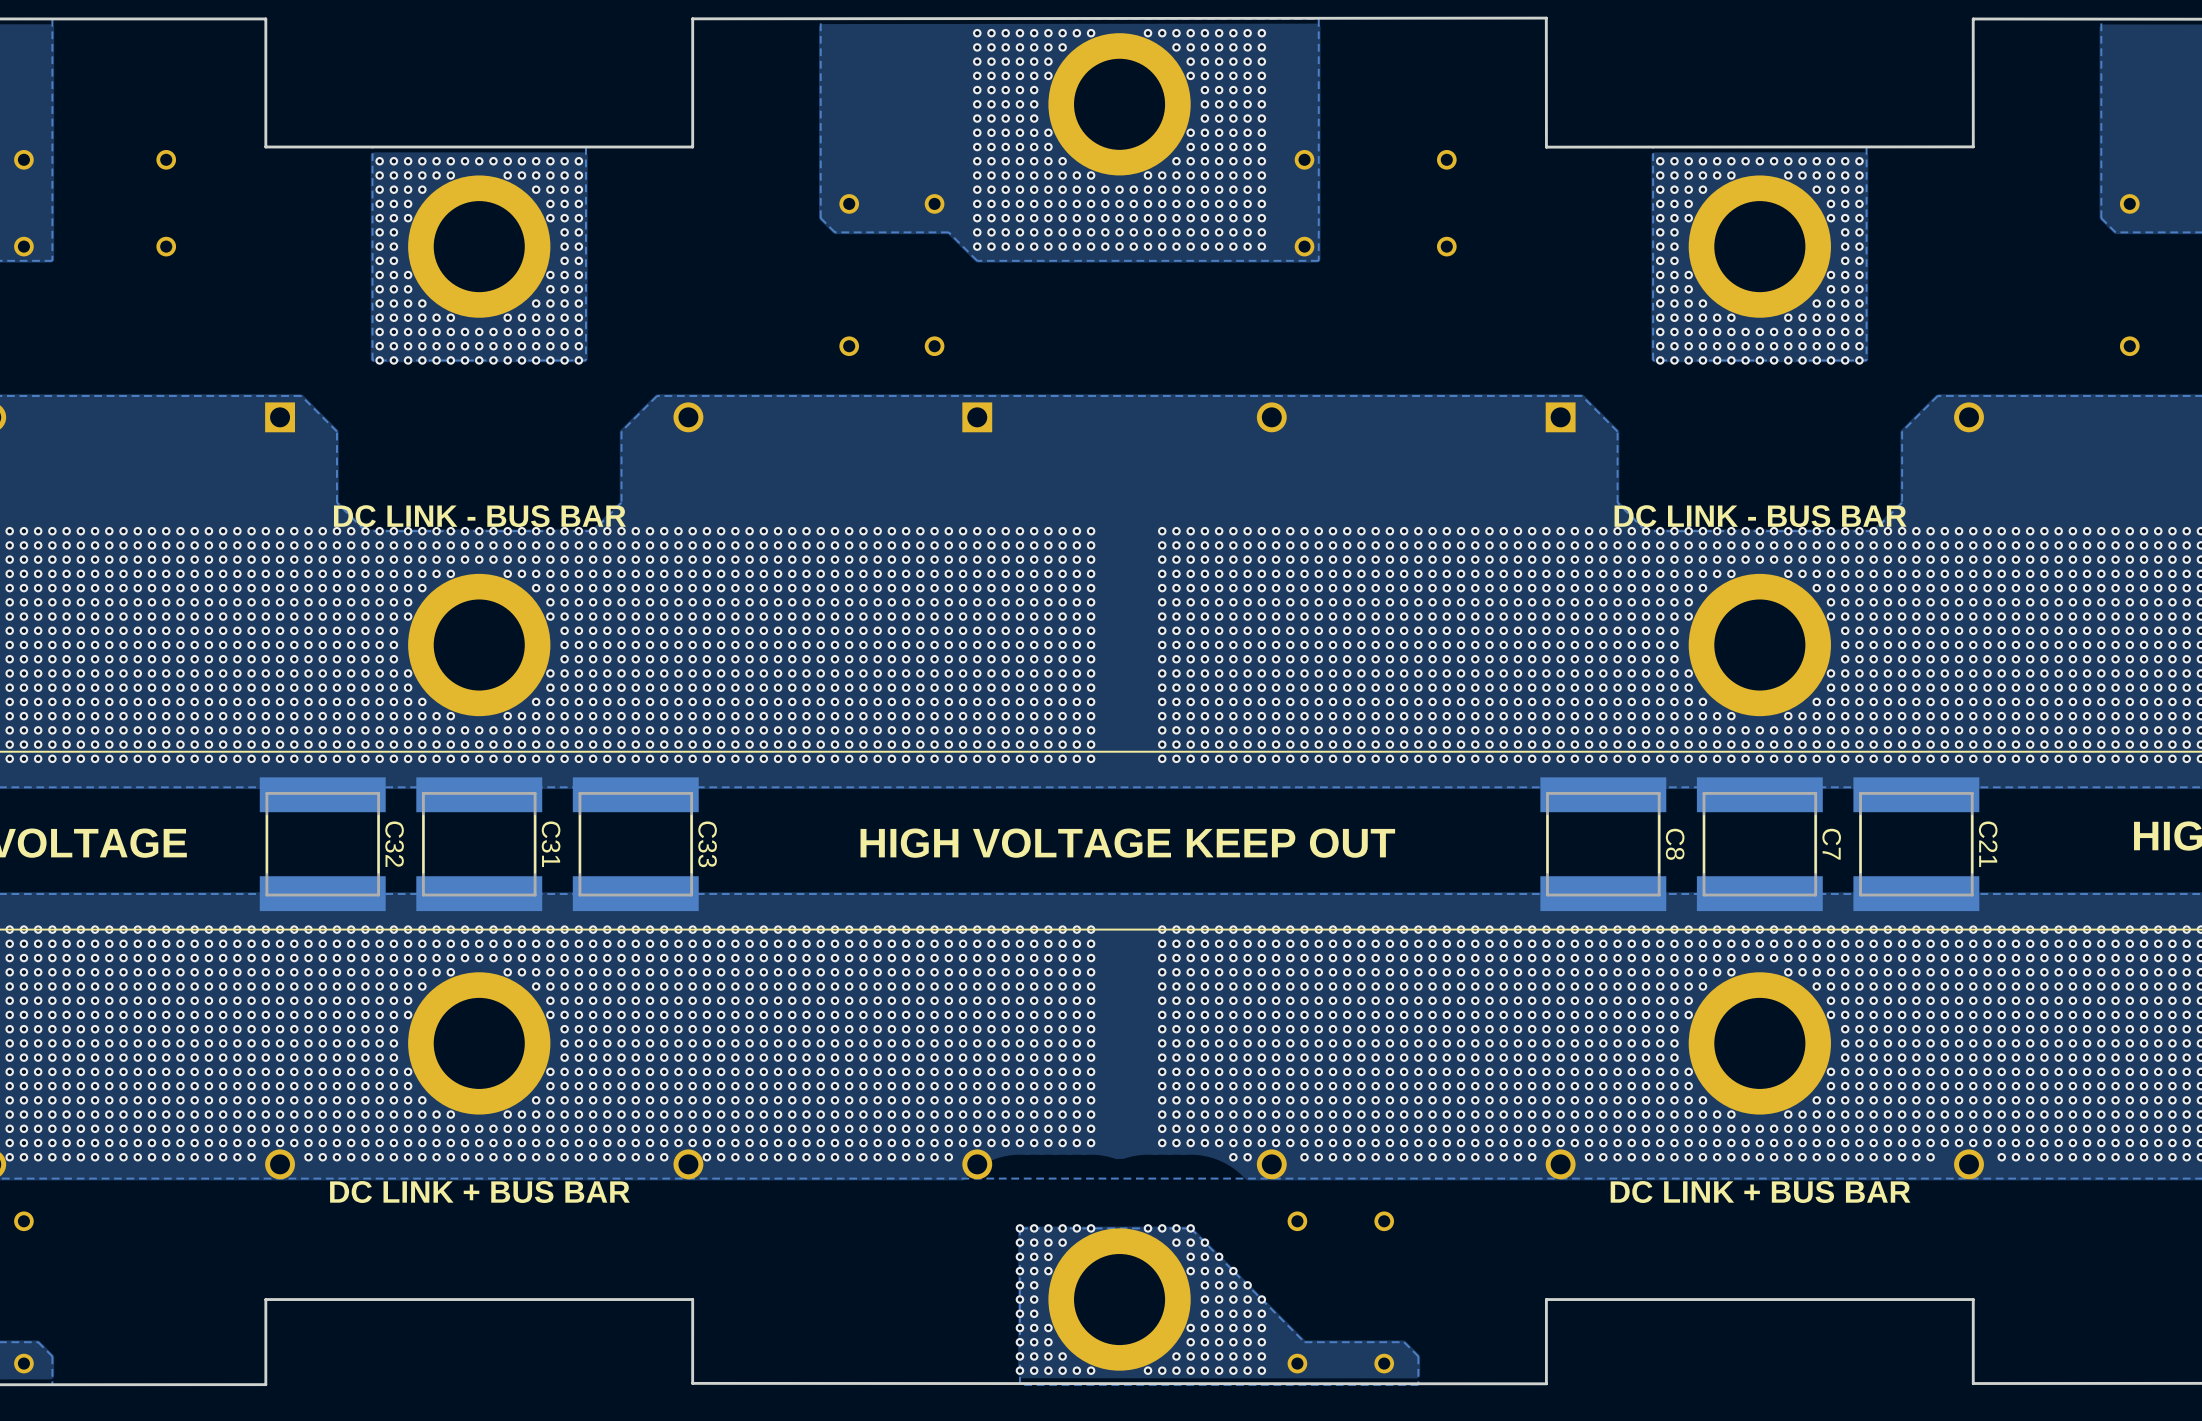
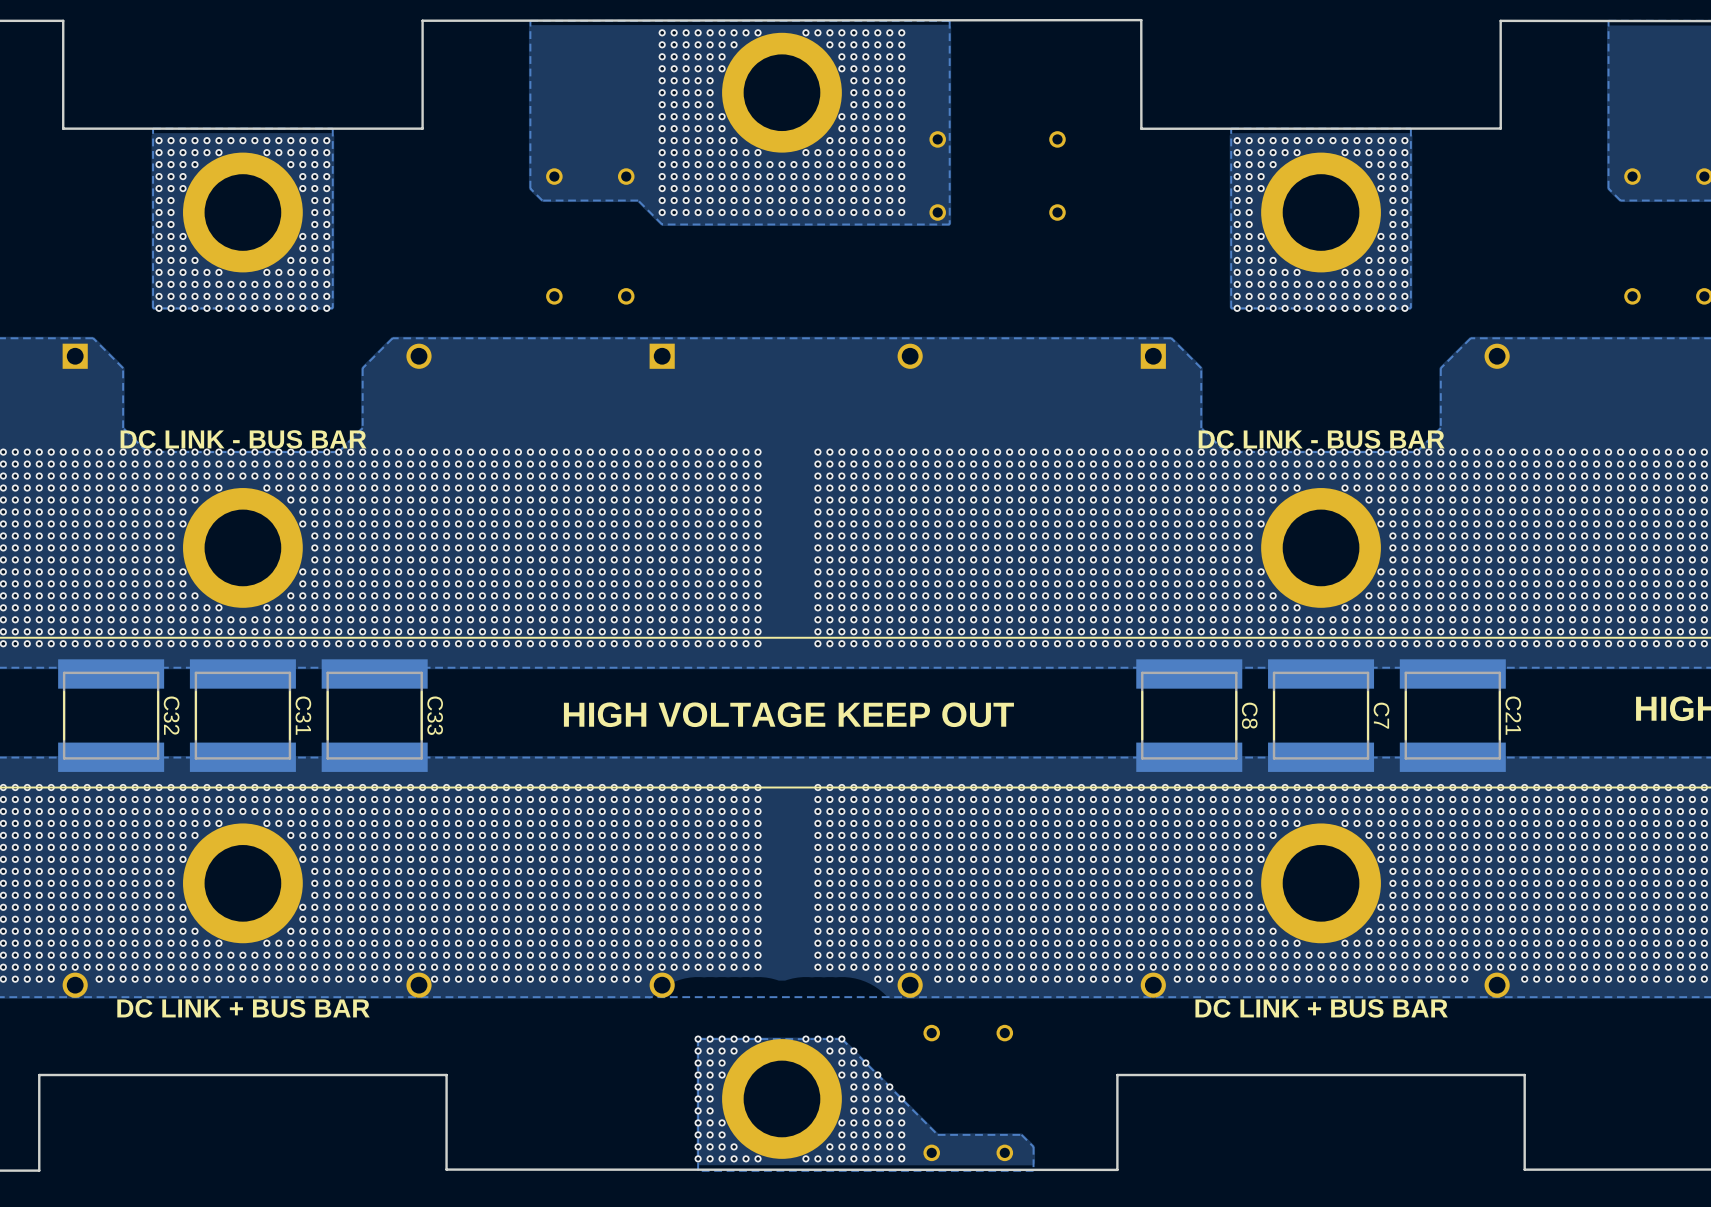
board edge: (721, 1383) (692, 1383) (692, 1299) (265, 1299) (265, 1384) (237, 1384) -> (446, 1169) (446, 1075) (39, 1075) (39, 1170)
board edge: (2001, 1383) (1973, 1383) (1973, 1299) (1546, 1299) (1546, 1383) (1517, 1383) -> (1524, 1169) (1524, 1075) (1117, 1075) (1117, 1169)

